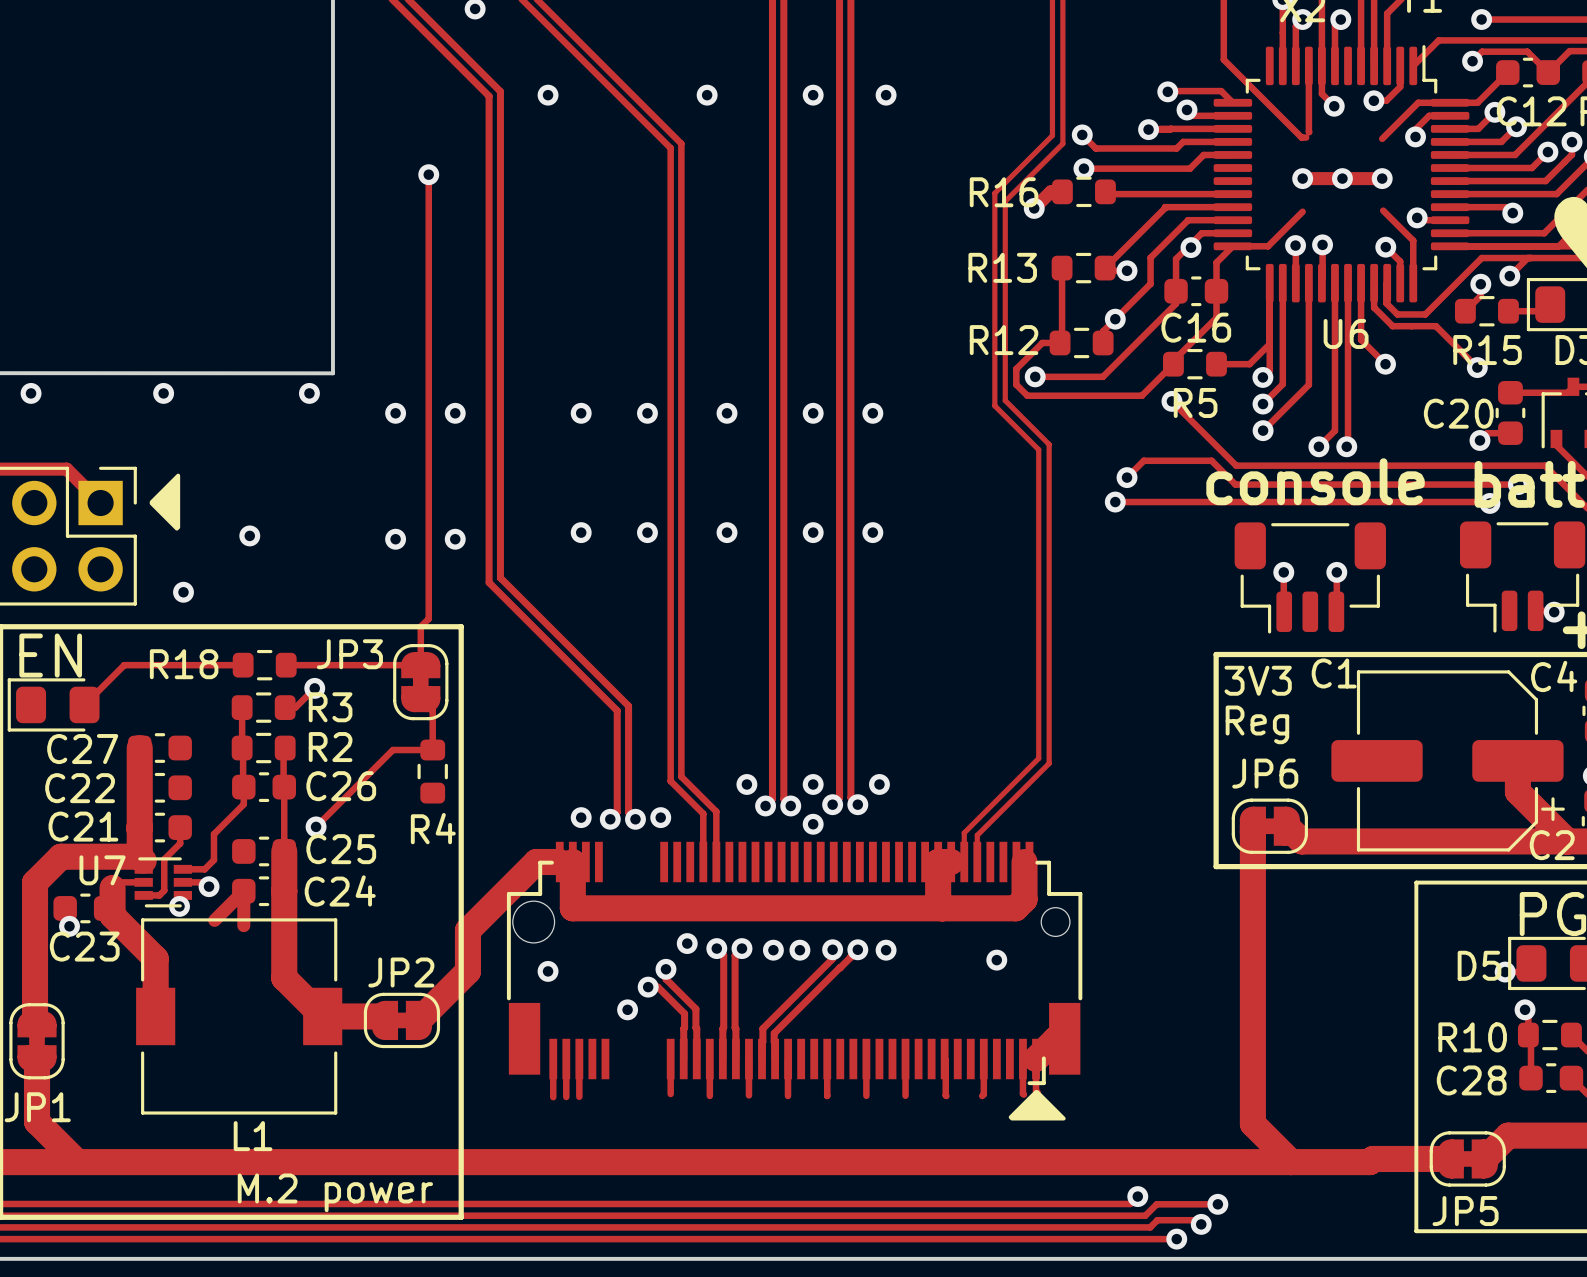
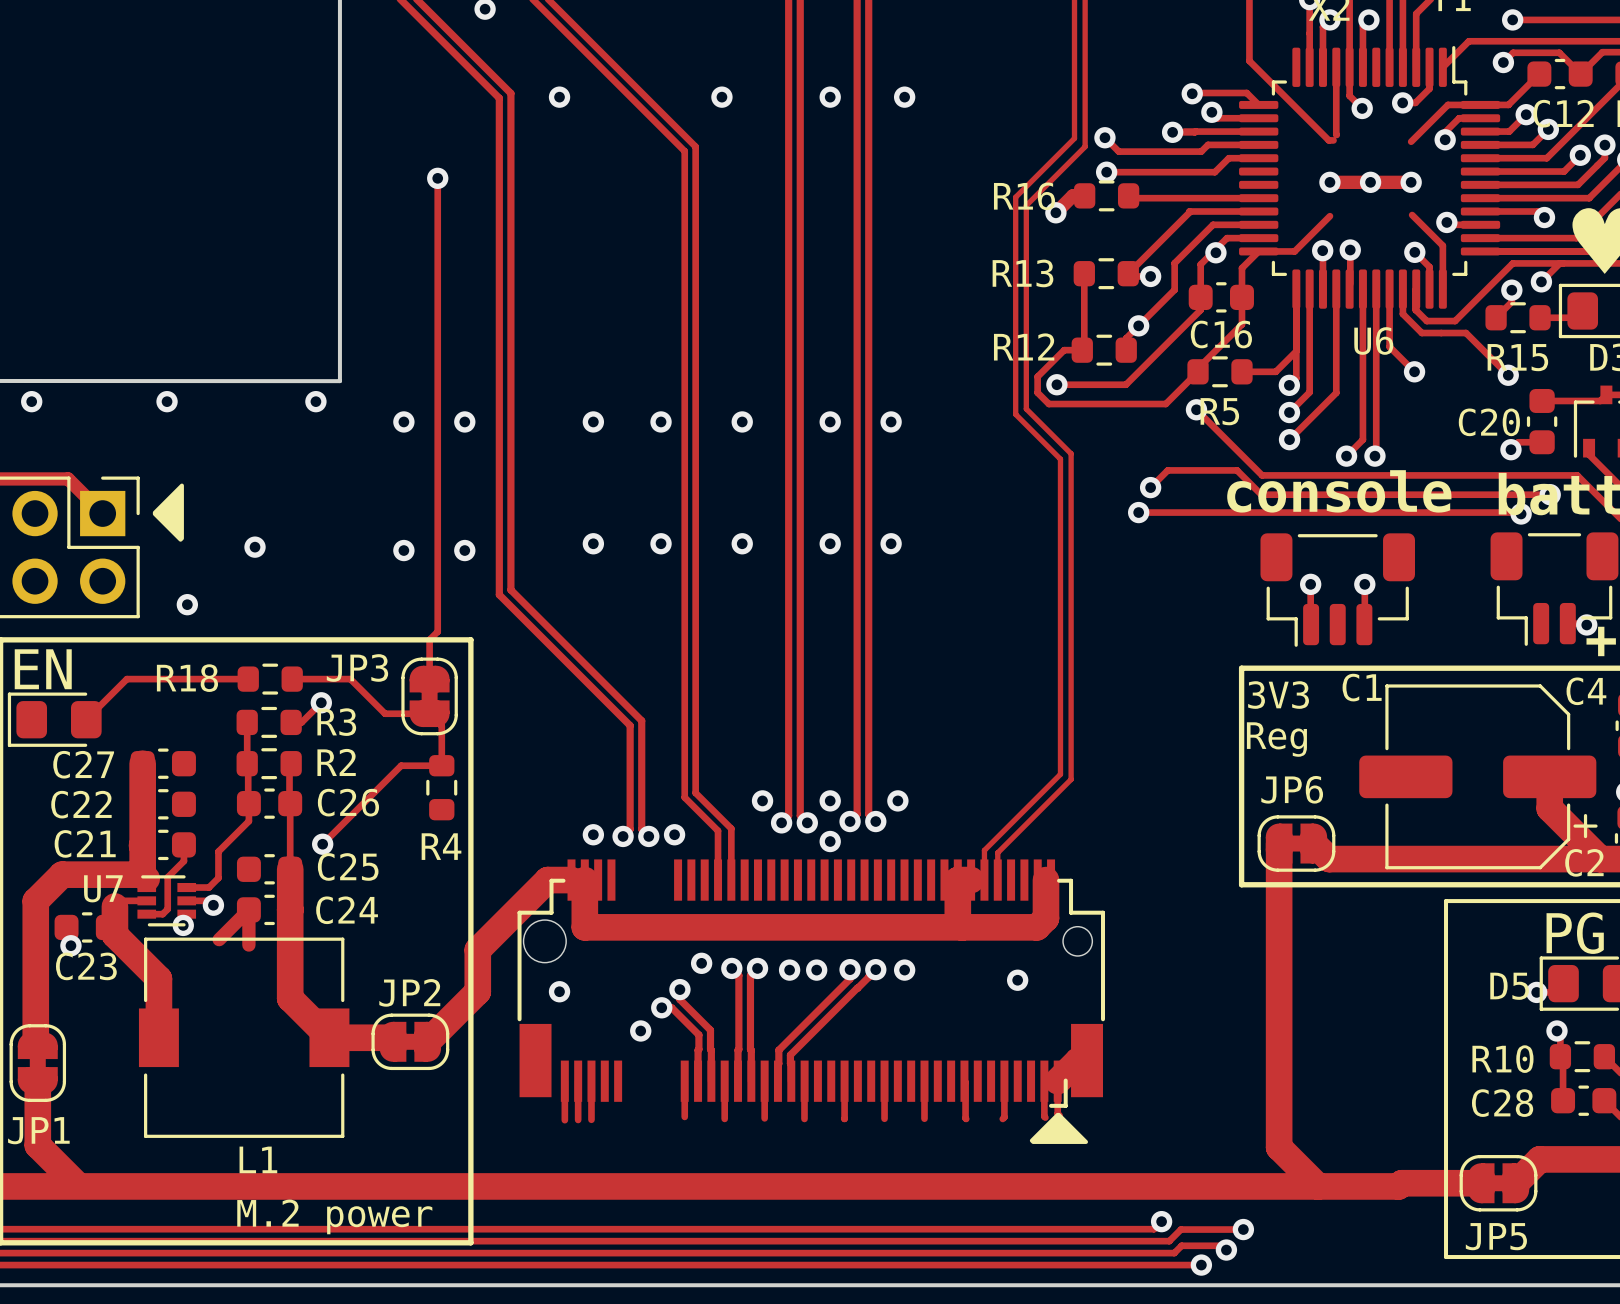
track: (343, 665) (420, 665) -> (350, 679) (385, 713) (429, 713)

